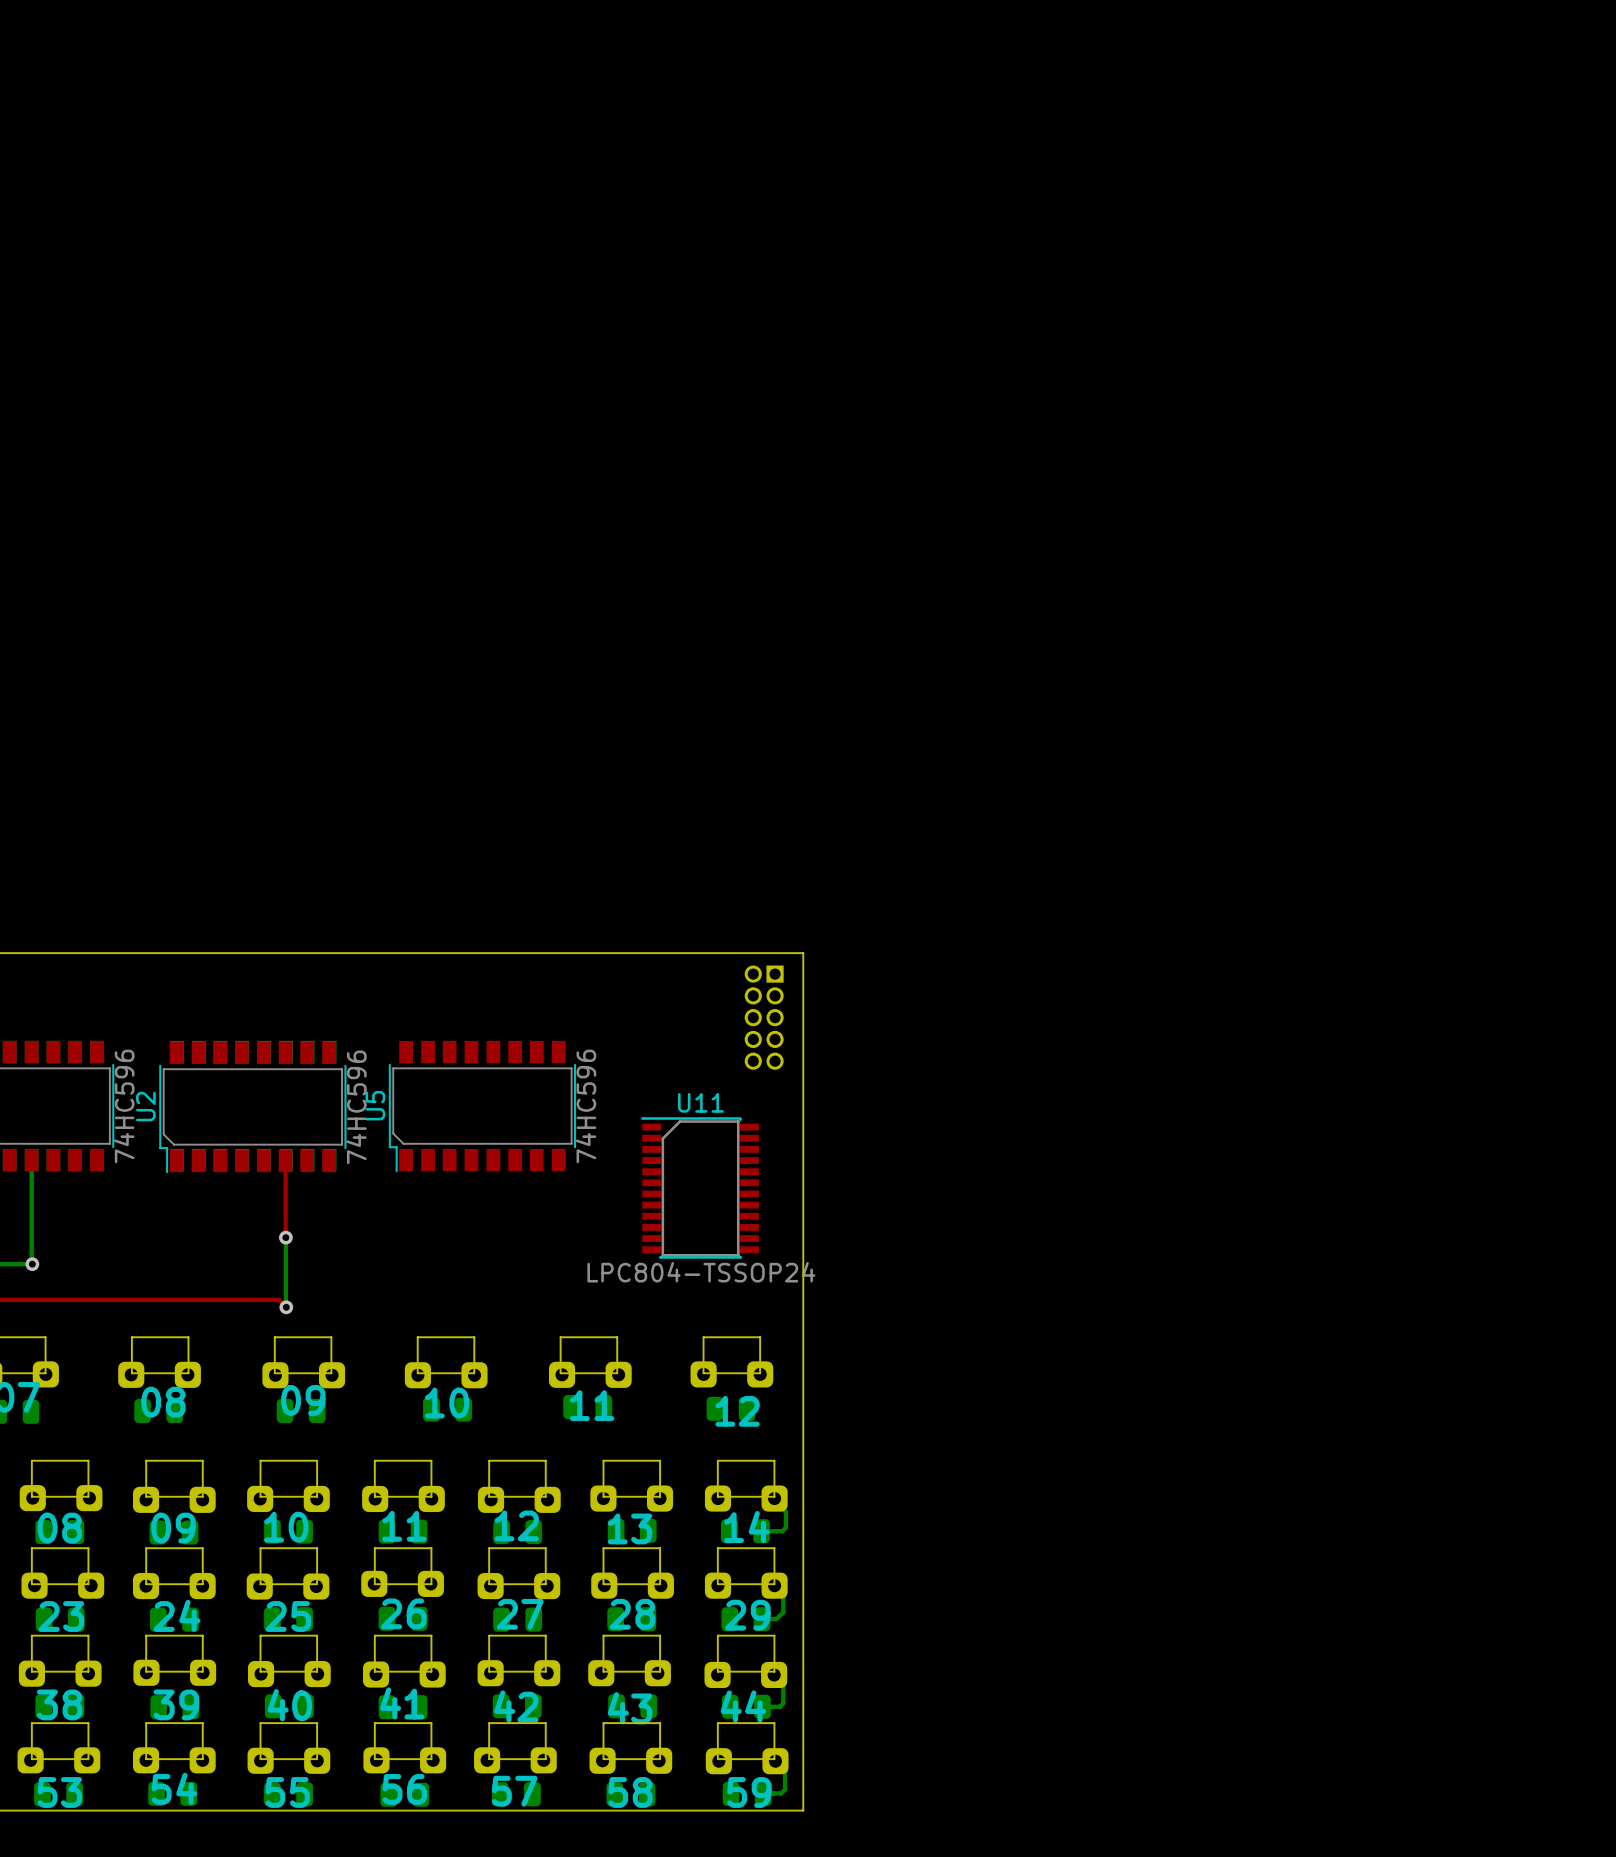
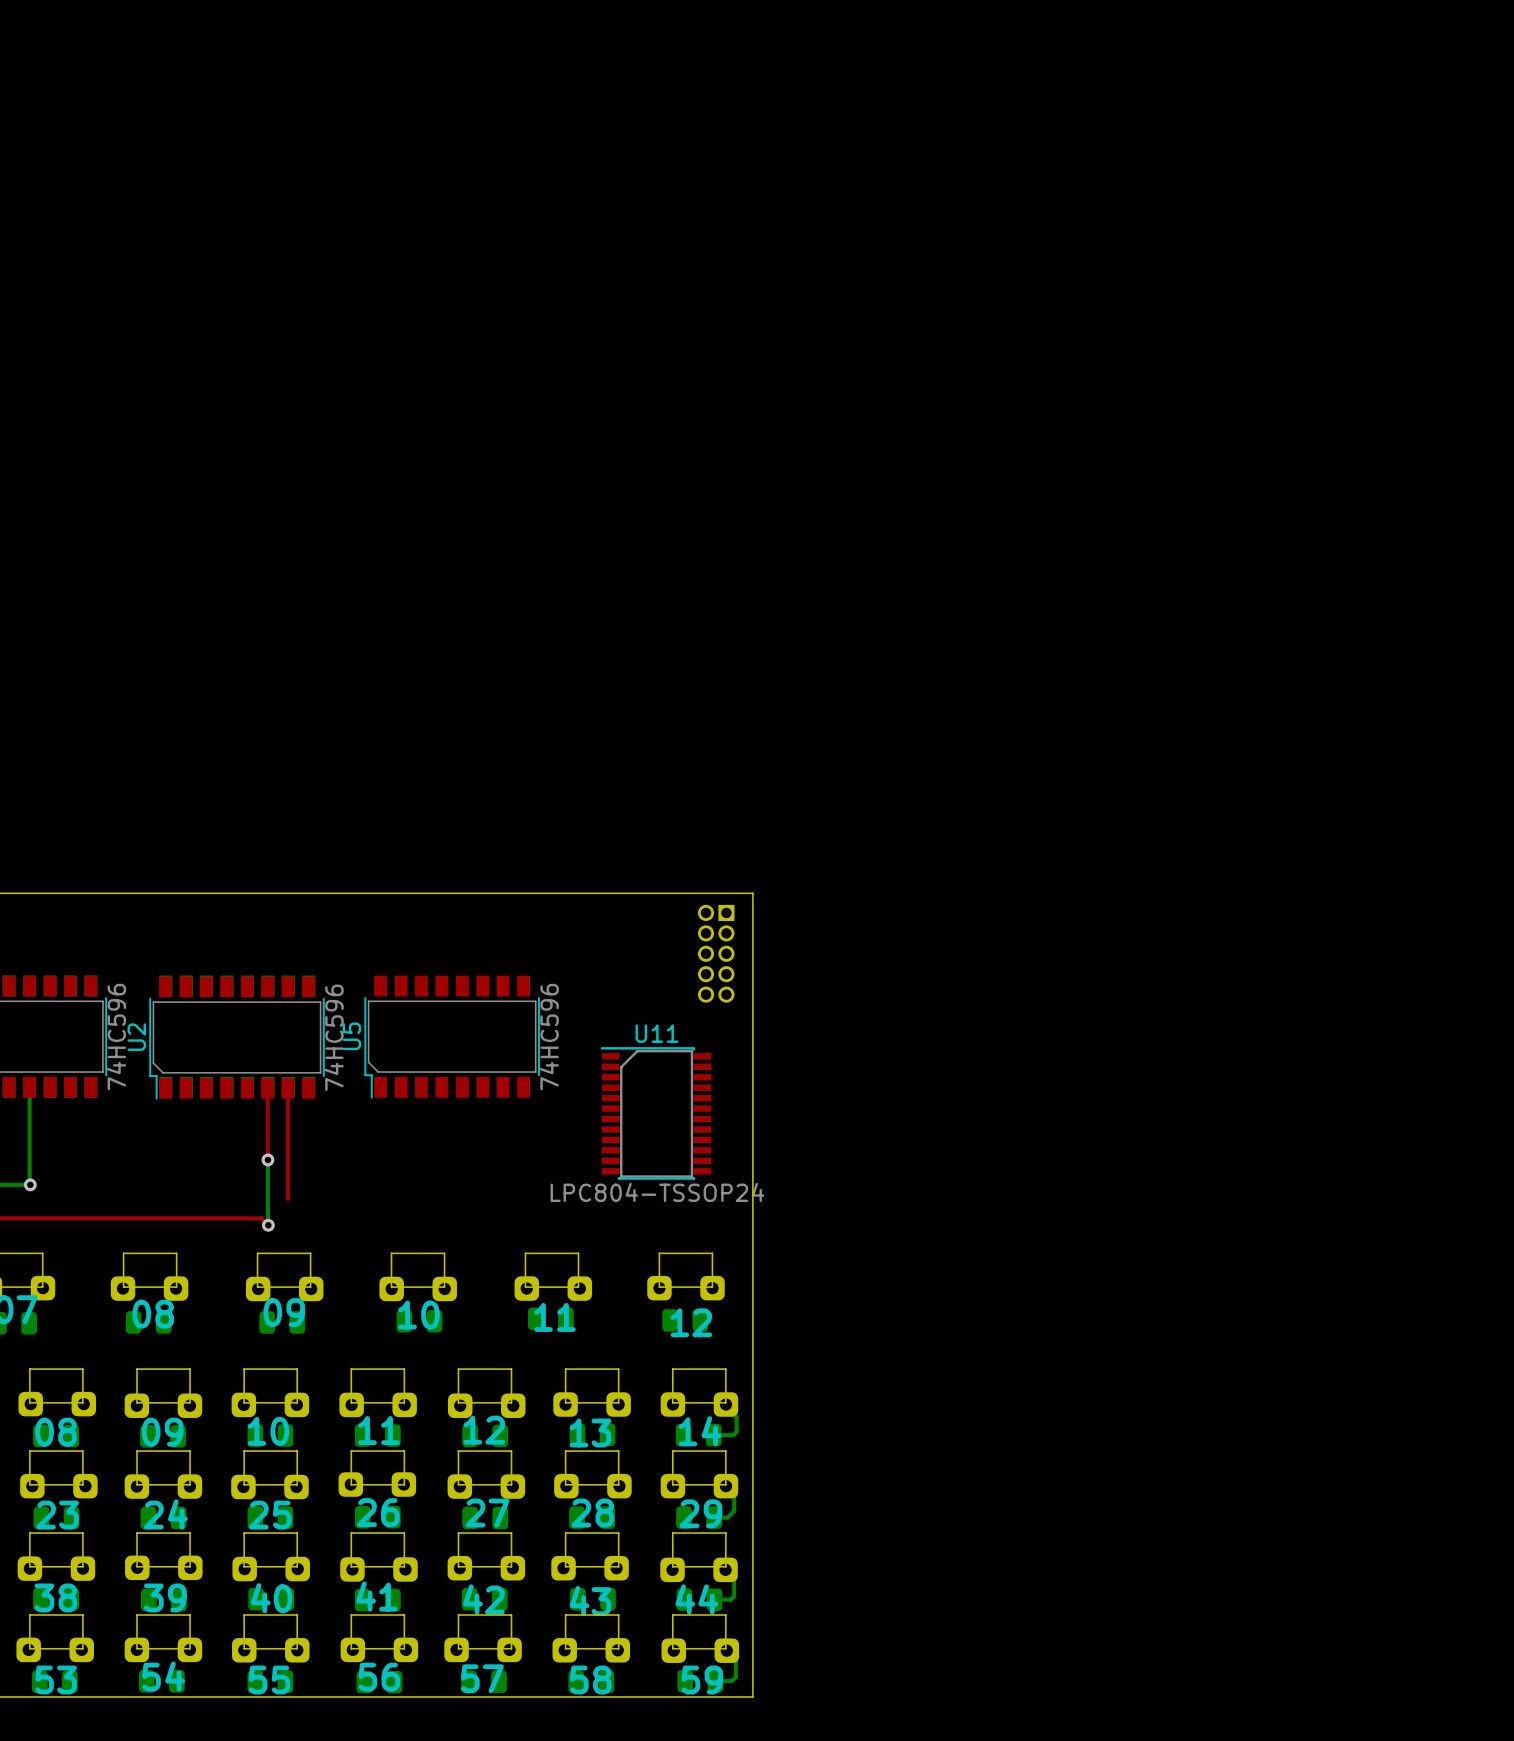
top track: none -> (287, 1088) (287, 1199)

